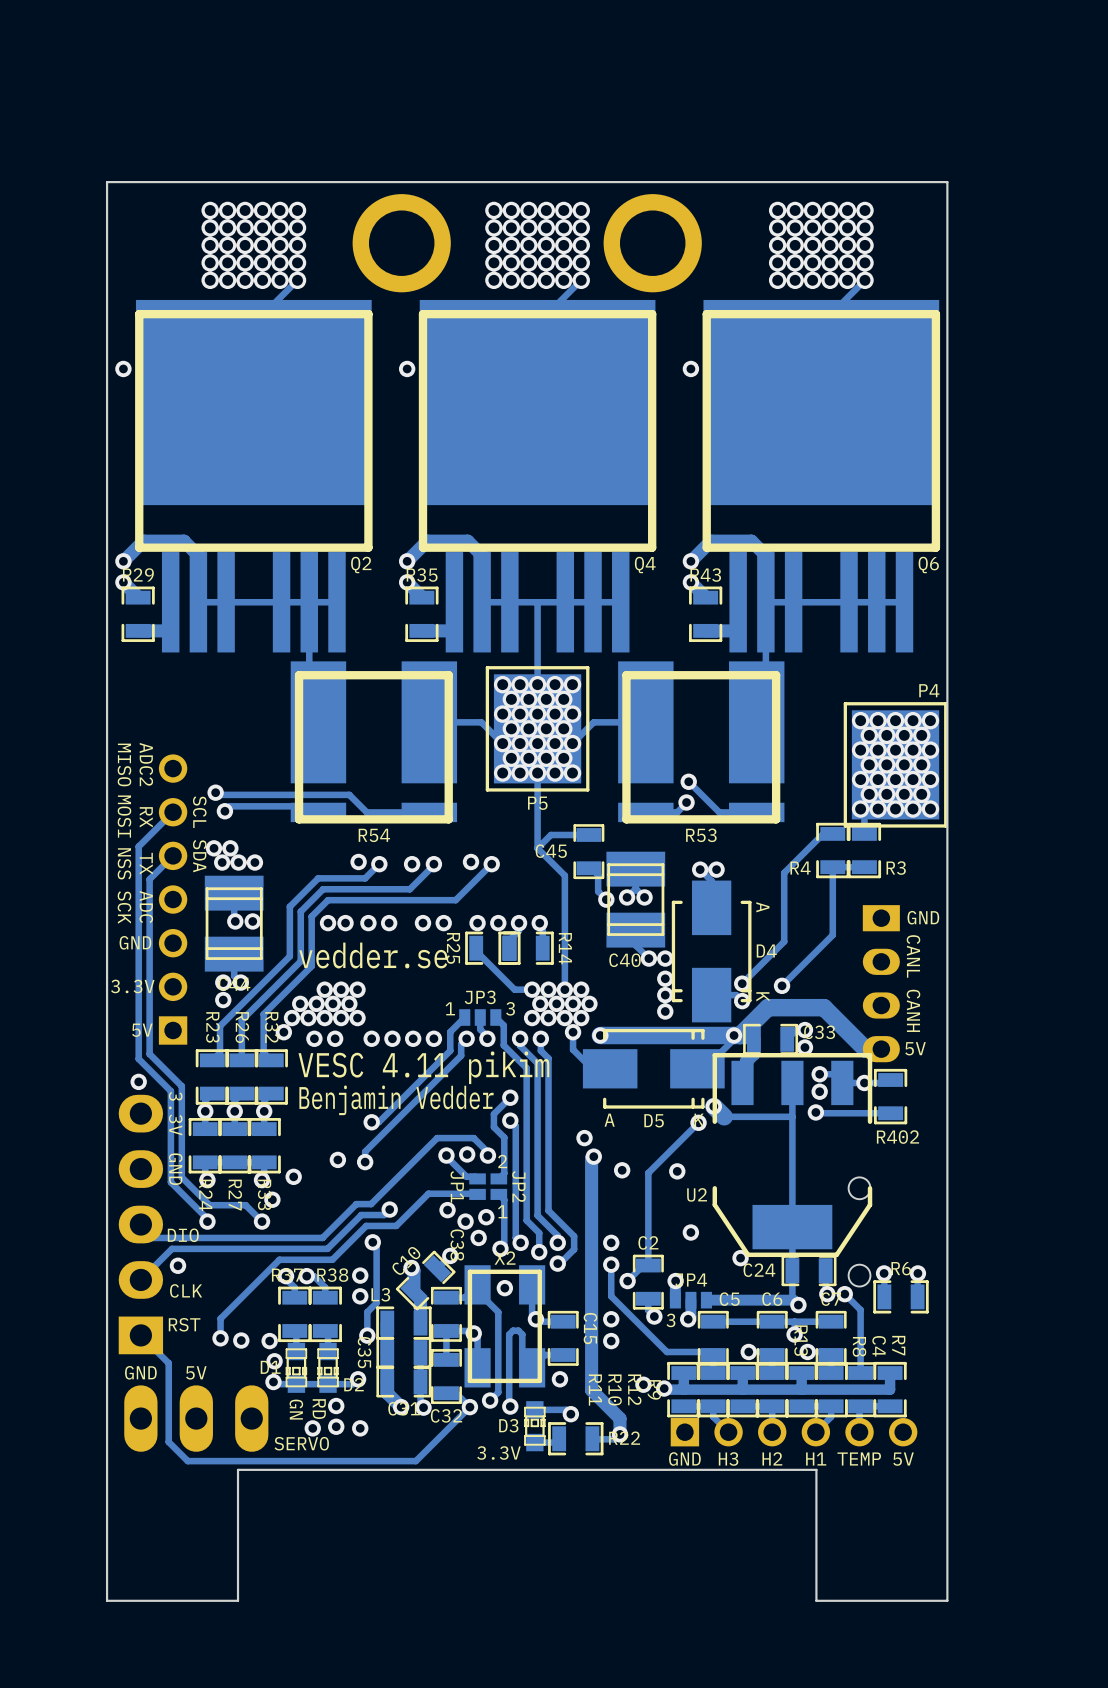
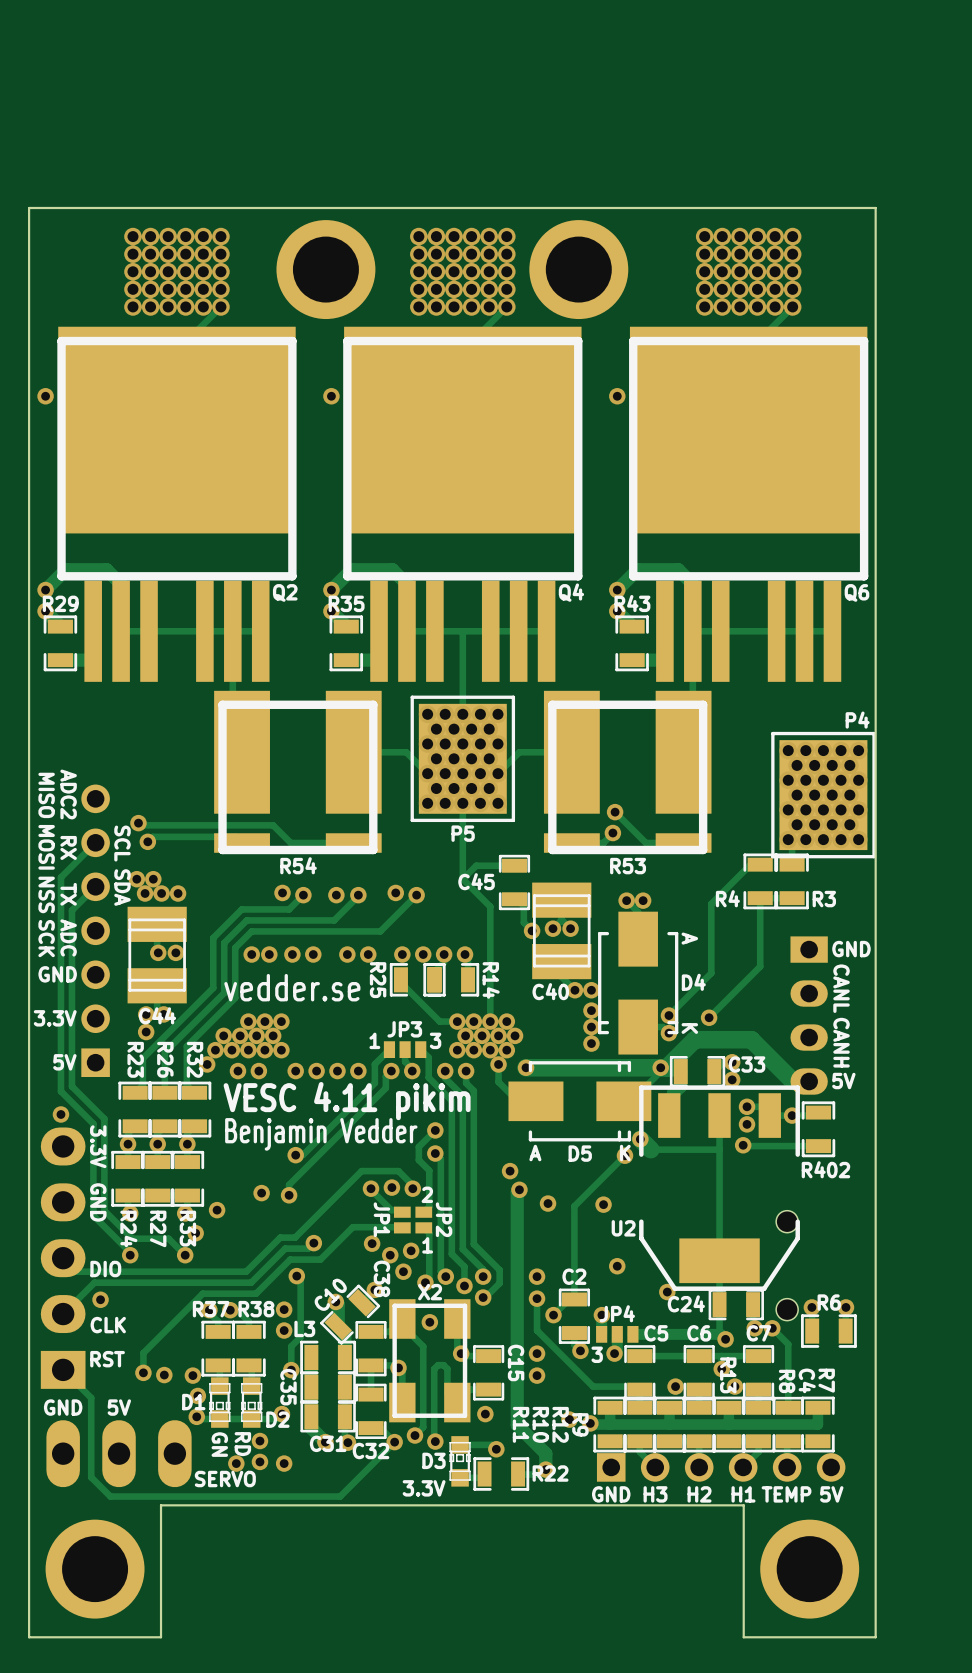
part: none -> (95, 1569)
part: none -> (809, 1569)

